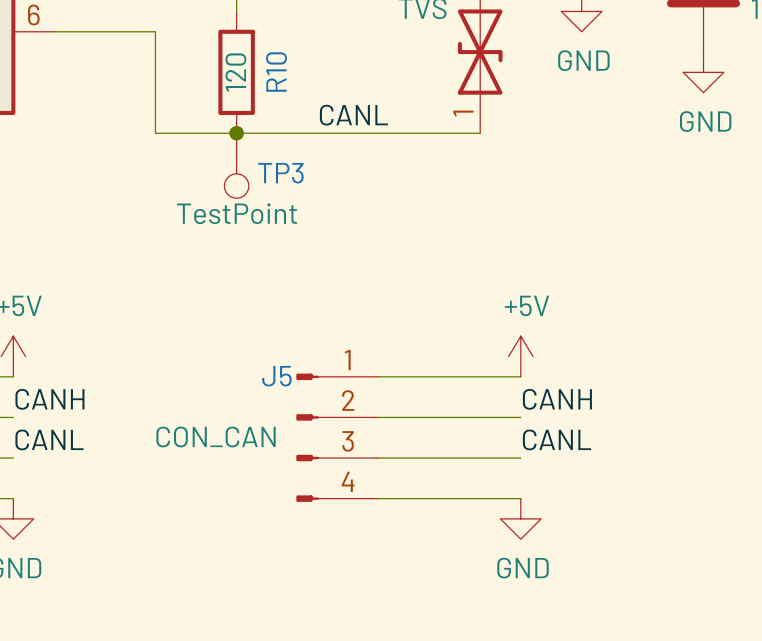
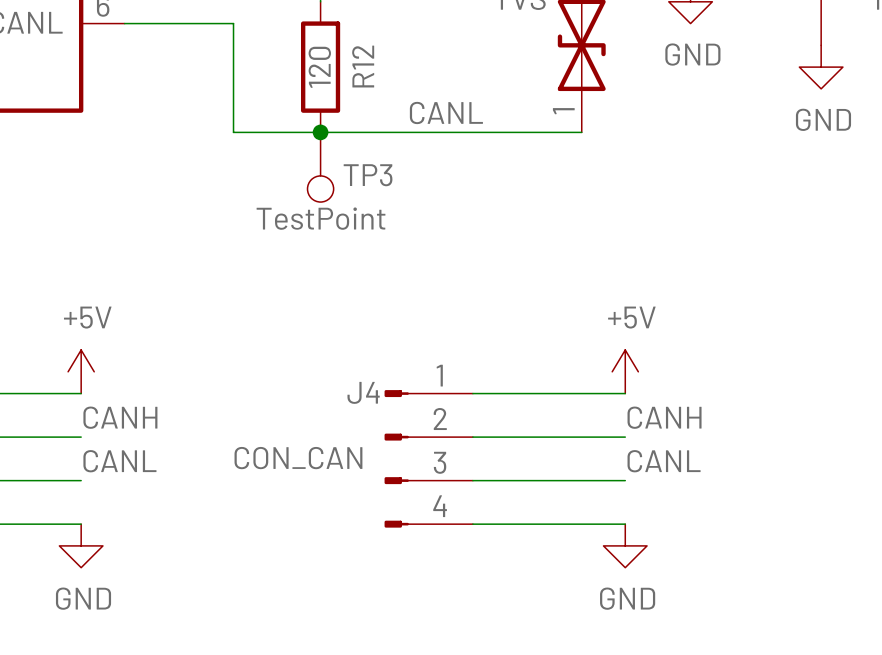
R10 name: R10 (276, 72) -> R12 (363, 66)
J5 name: J5 (276, 376) -> J4 (363, 392)

